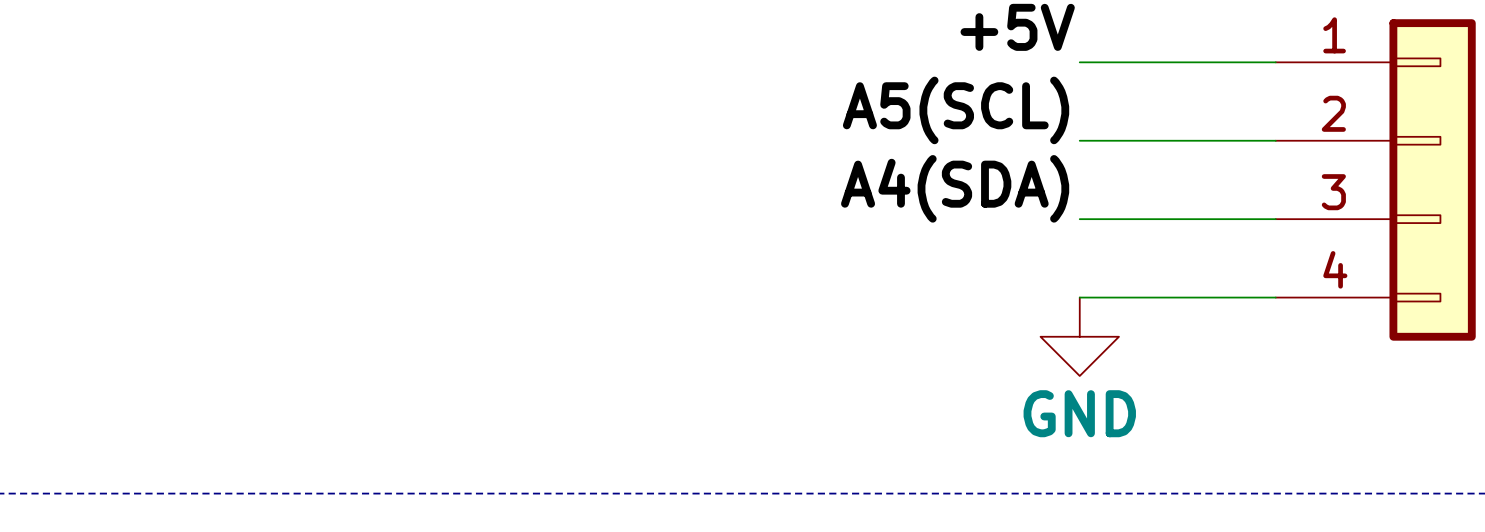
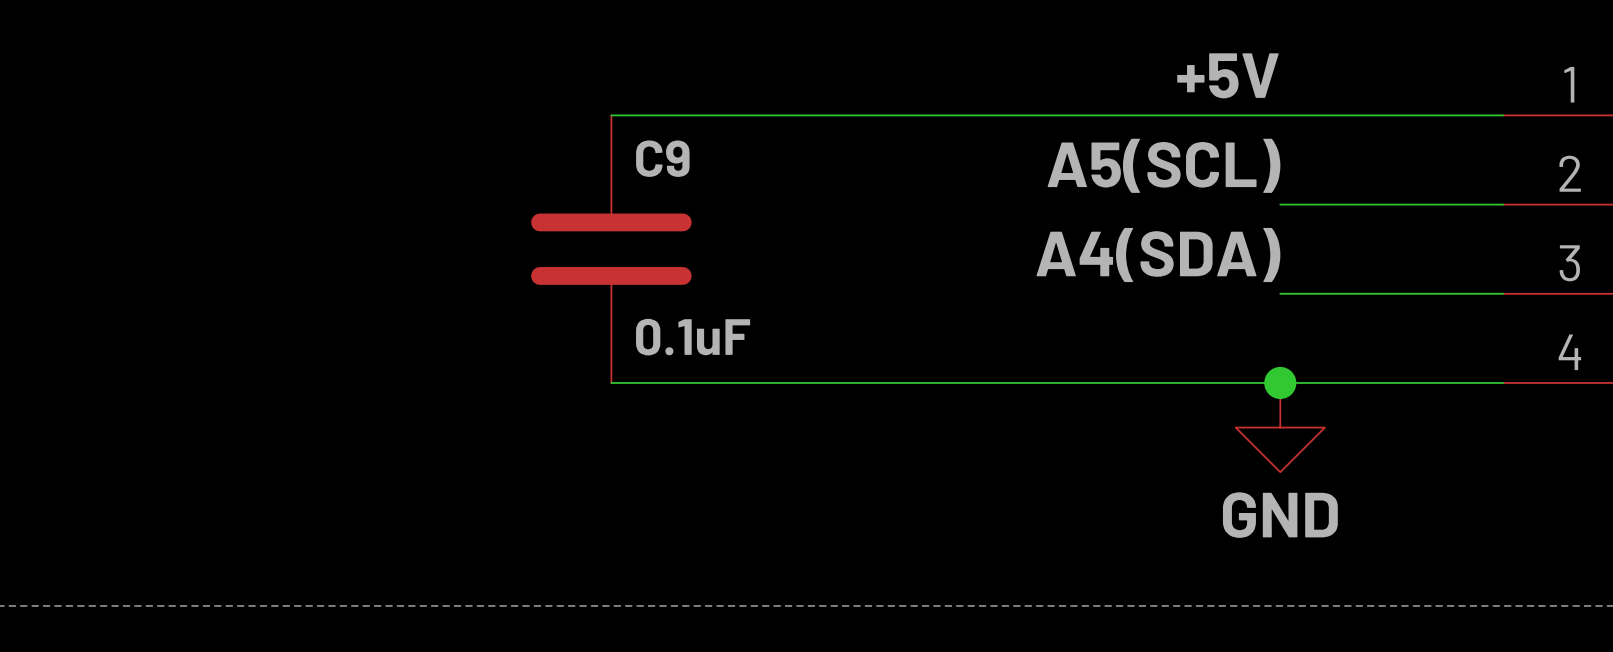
wire: none -> (611, 115) (1280, 115)
C9: none -> 0.1uF (611, 249)
wire: none -> (611, 382) (1280, 382)
junction: none -> (1280, 382)

